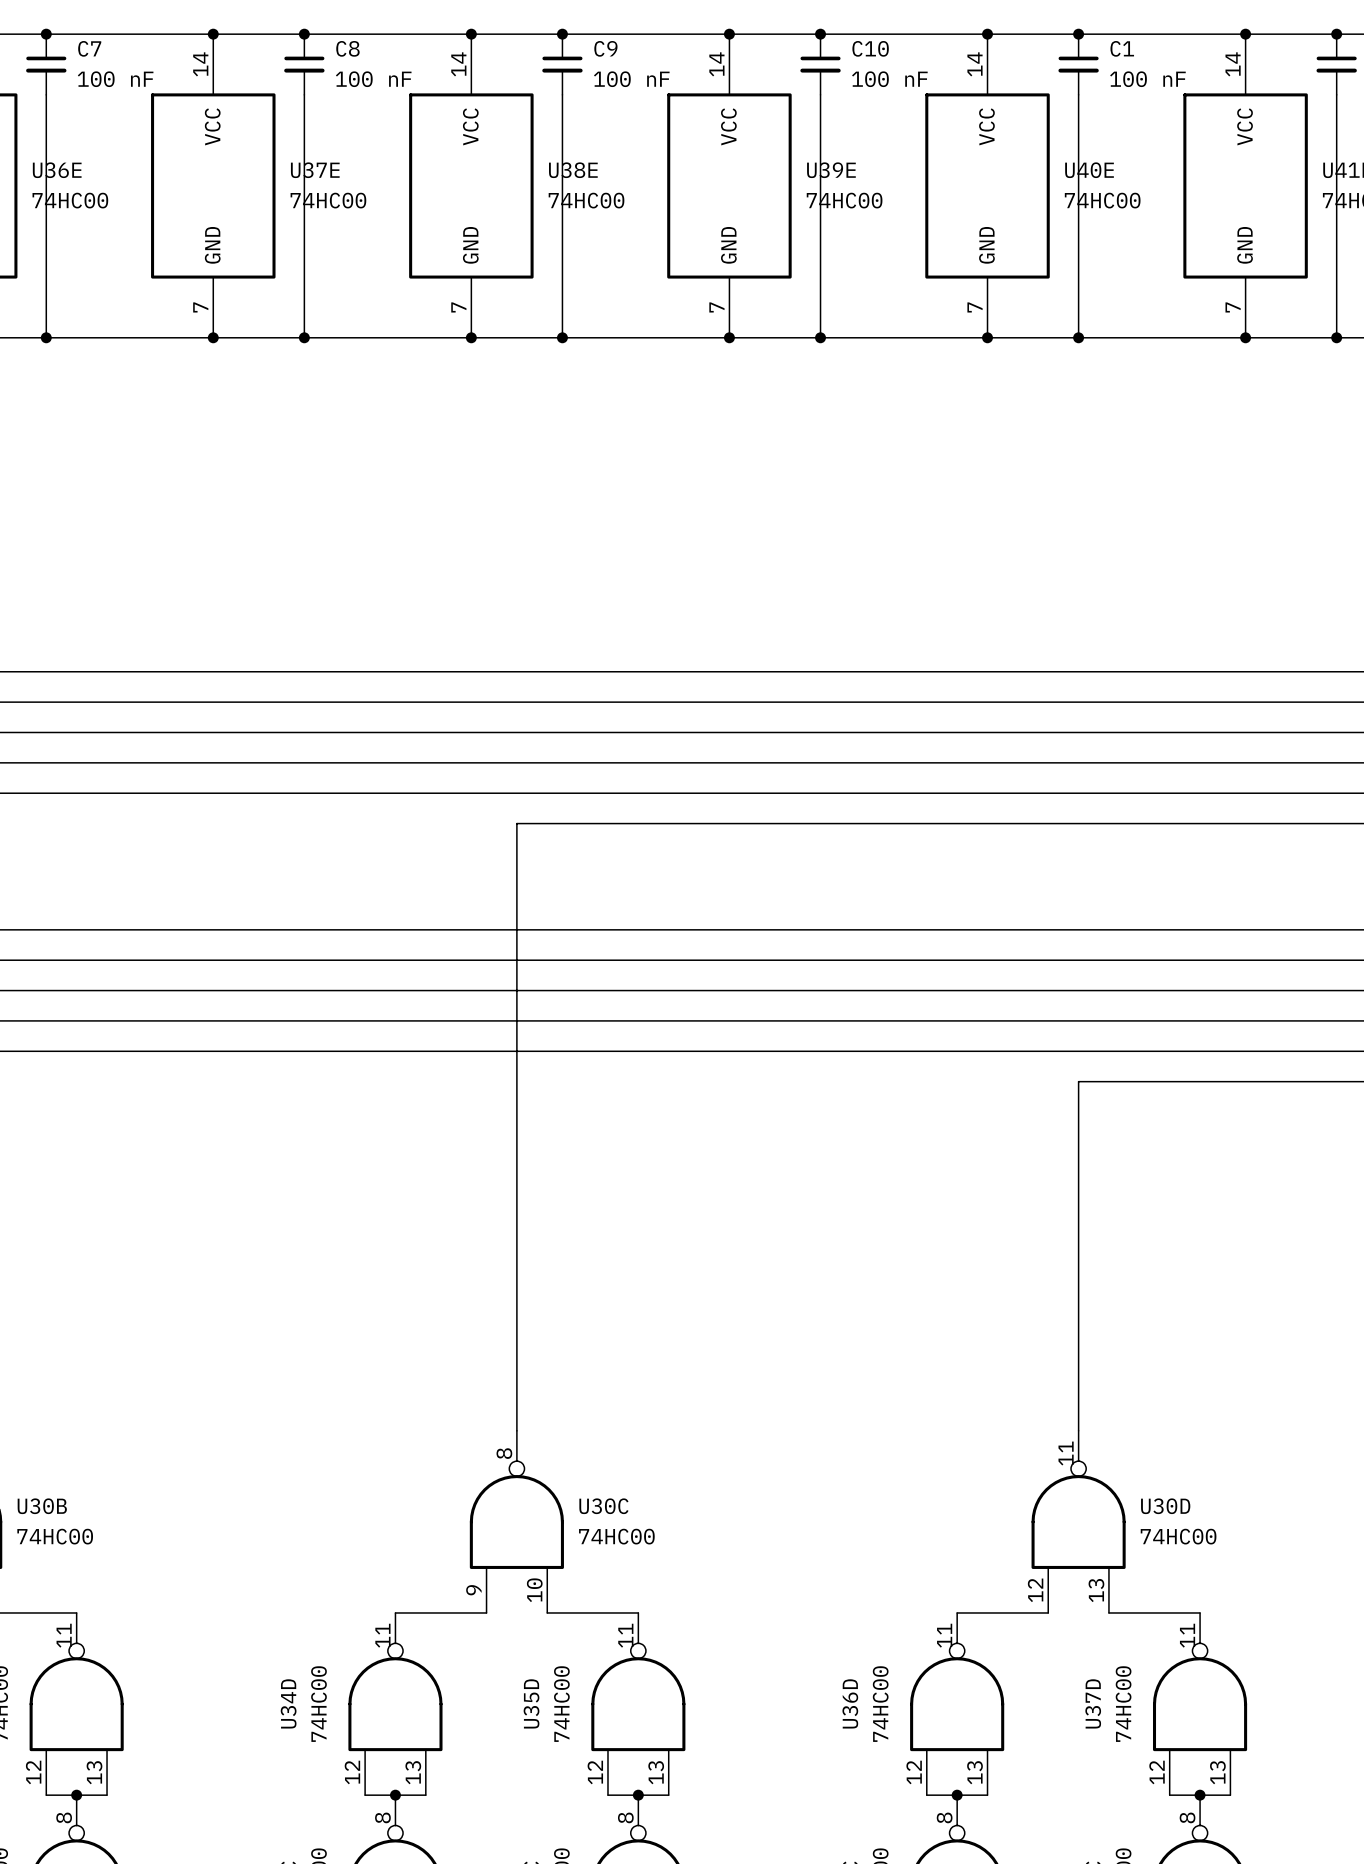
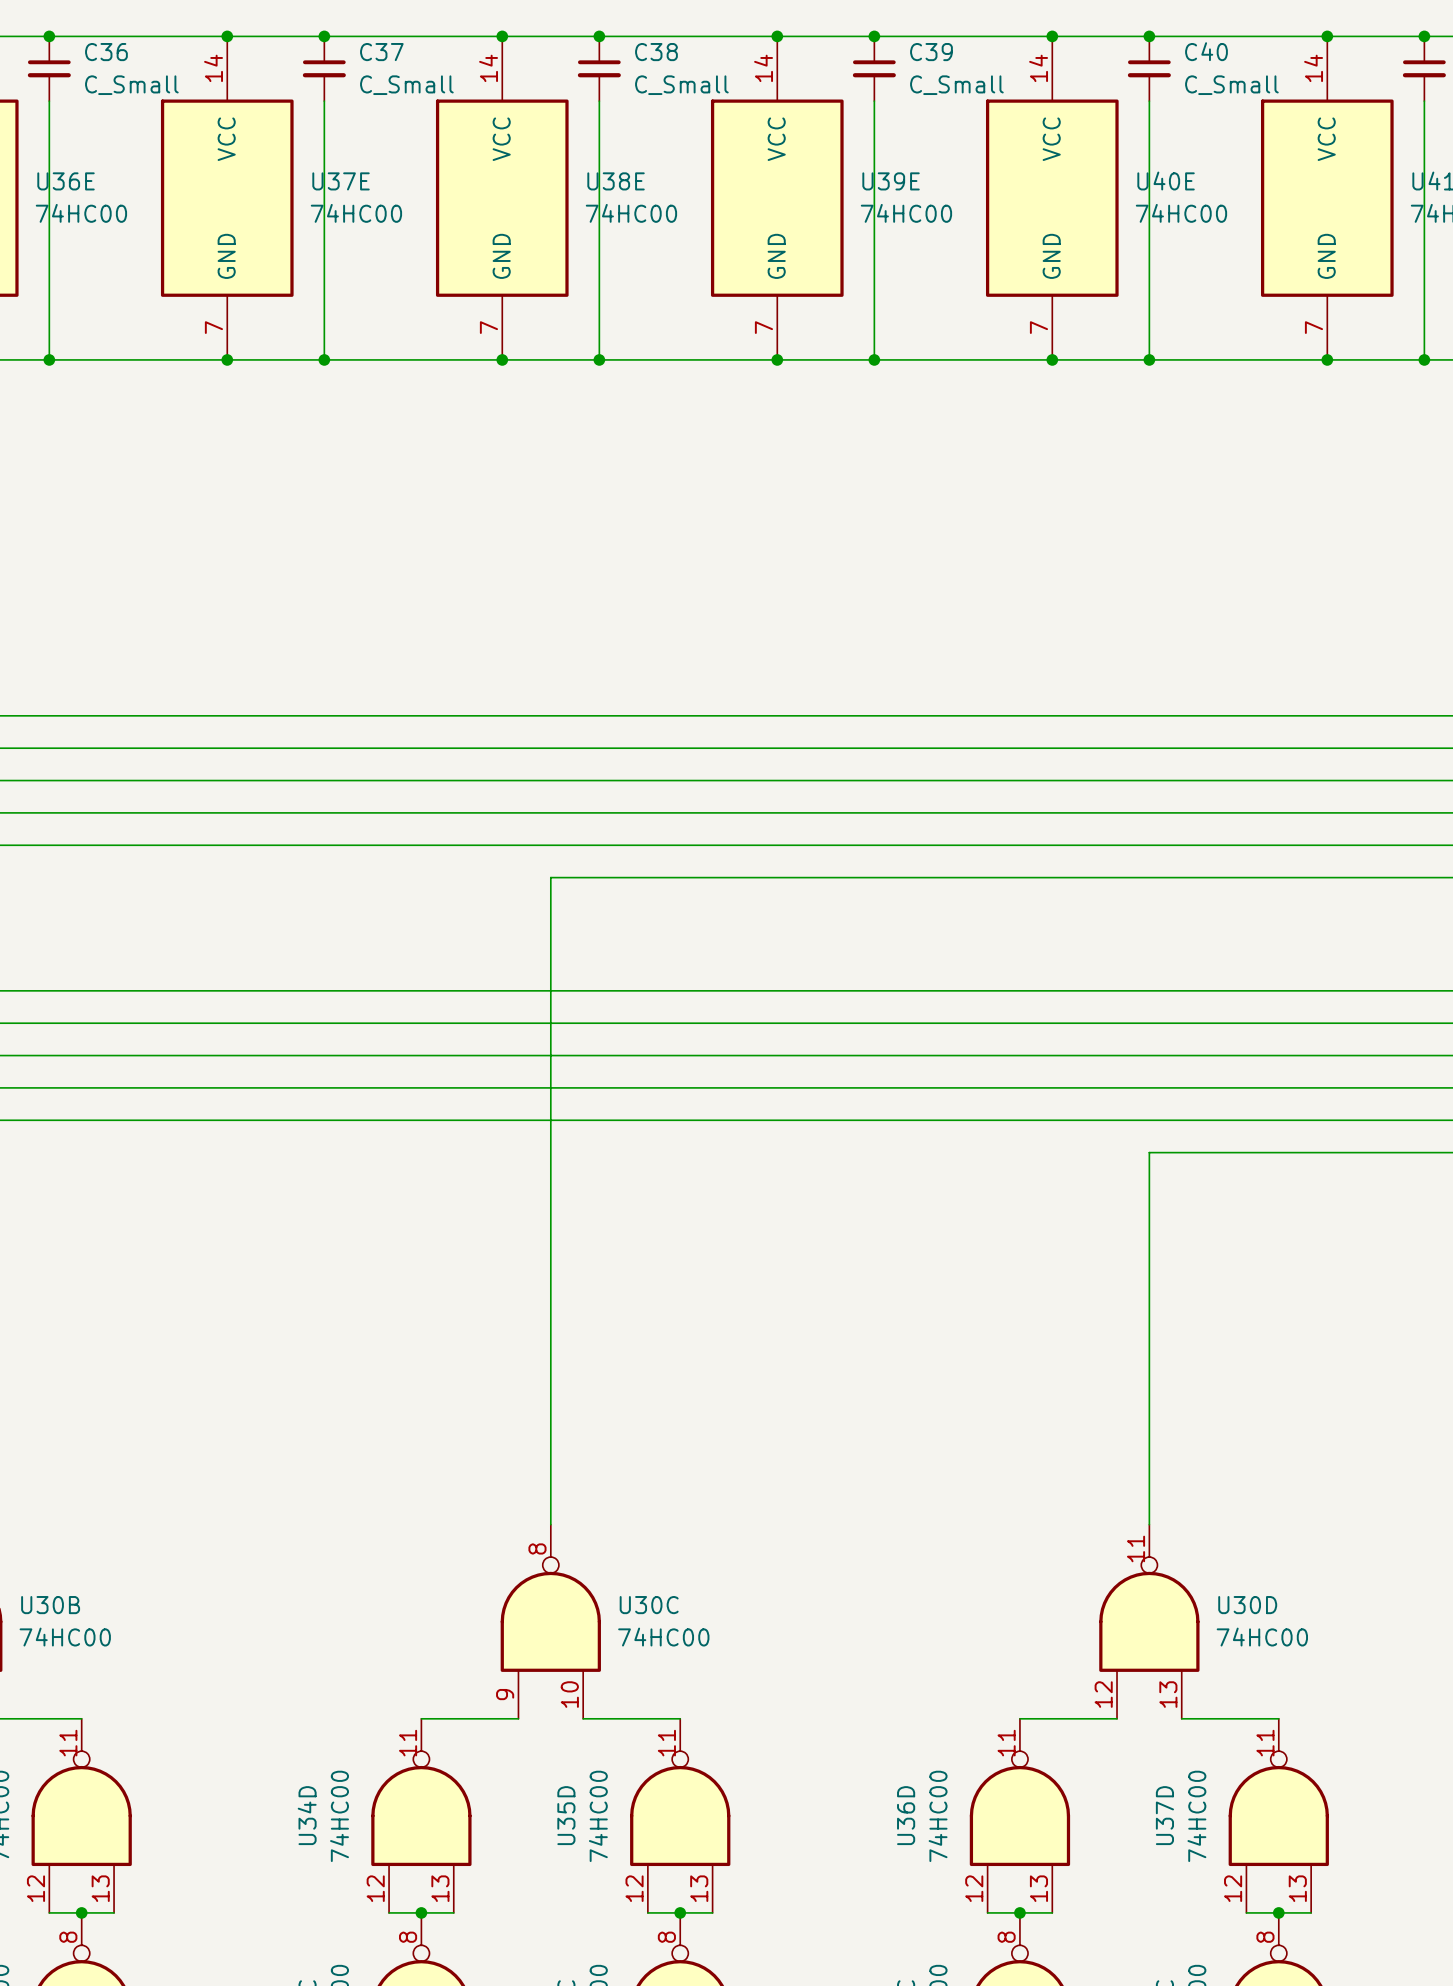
C7 name: C7 (89, 48) -> C36 (106, 52)
C8 name: C8 (347, 48) -> C37 (381, 52)
C9 name: C9 (605, 48) -> C38 (656, 52)
C10 name: C10 (870, 48) -> C39 (931, 52)
C1 name: C1 (1122, 48) -> C40 (1206, 51)
C7 value: 100 nF (115, 79) -> C_Small (131, 85)
C8 value: 100 nF (373, 79) -> C_Small (406, 85)
C9 value: 100 nF (631, 79) -> C_Small (681, 85)
C10 value: 100 nF (889, 79) -> C_Small (956, 85)
C1 value: 100 nF (1147, 79) -> C_Small (1231, 85)

